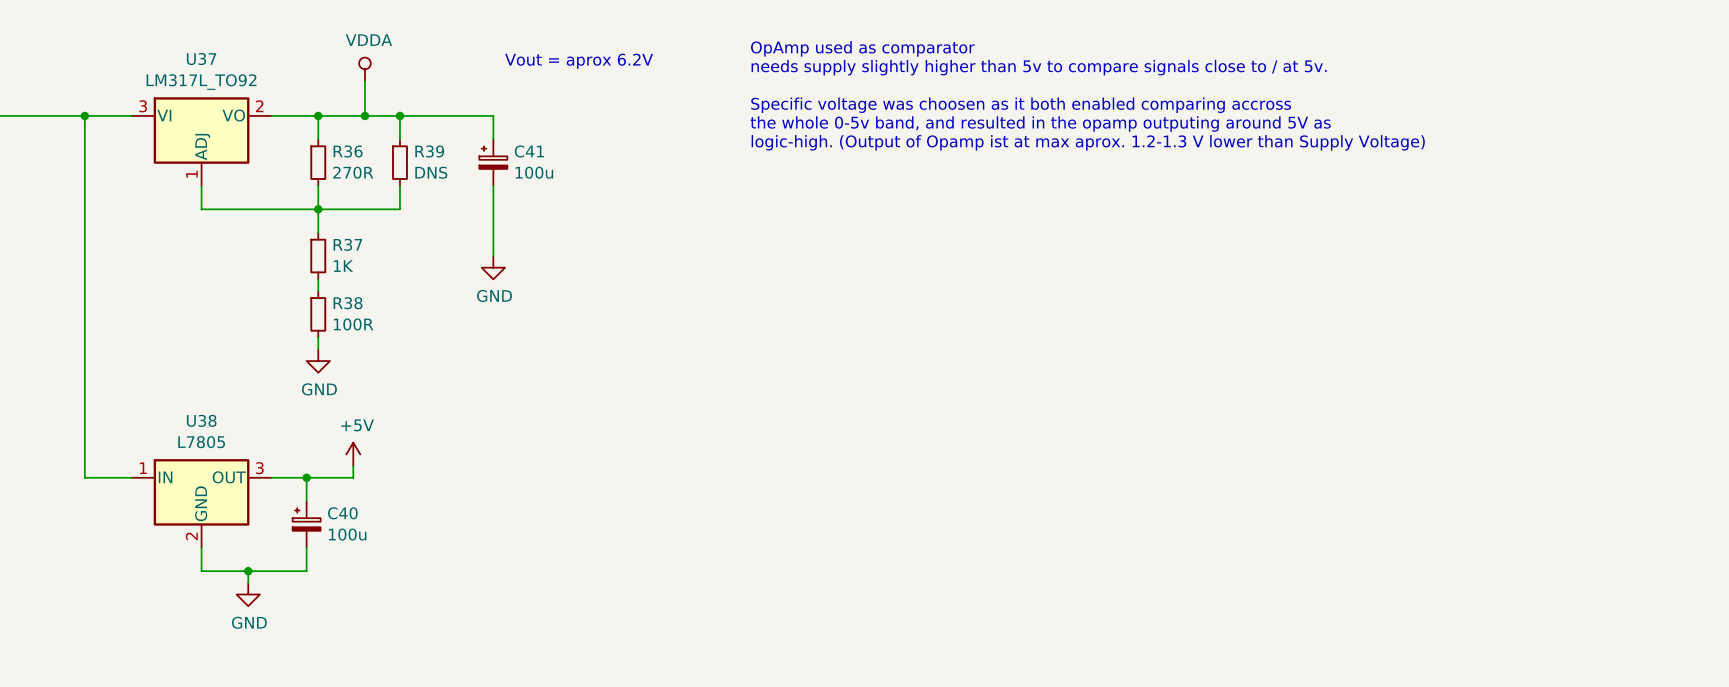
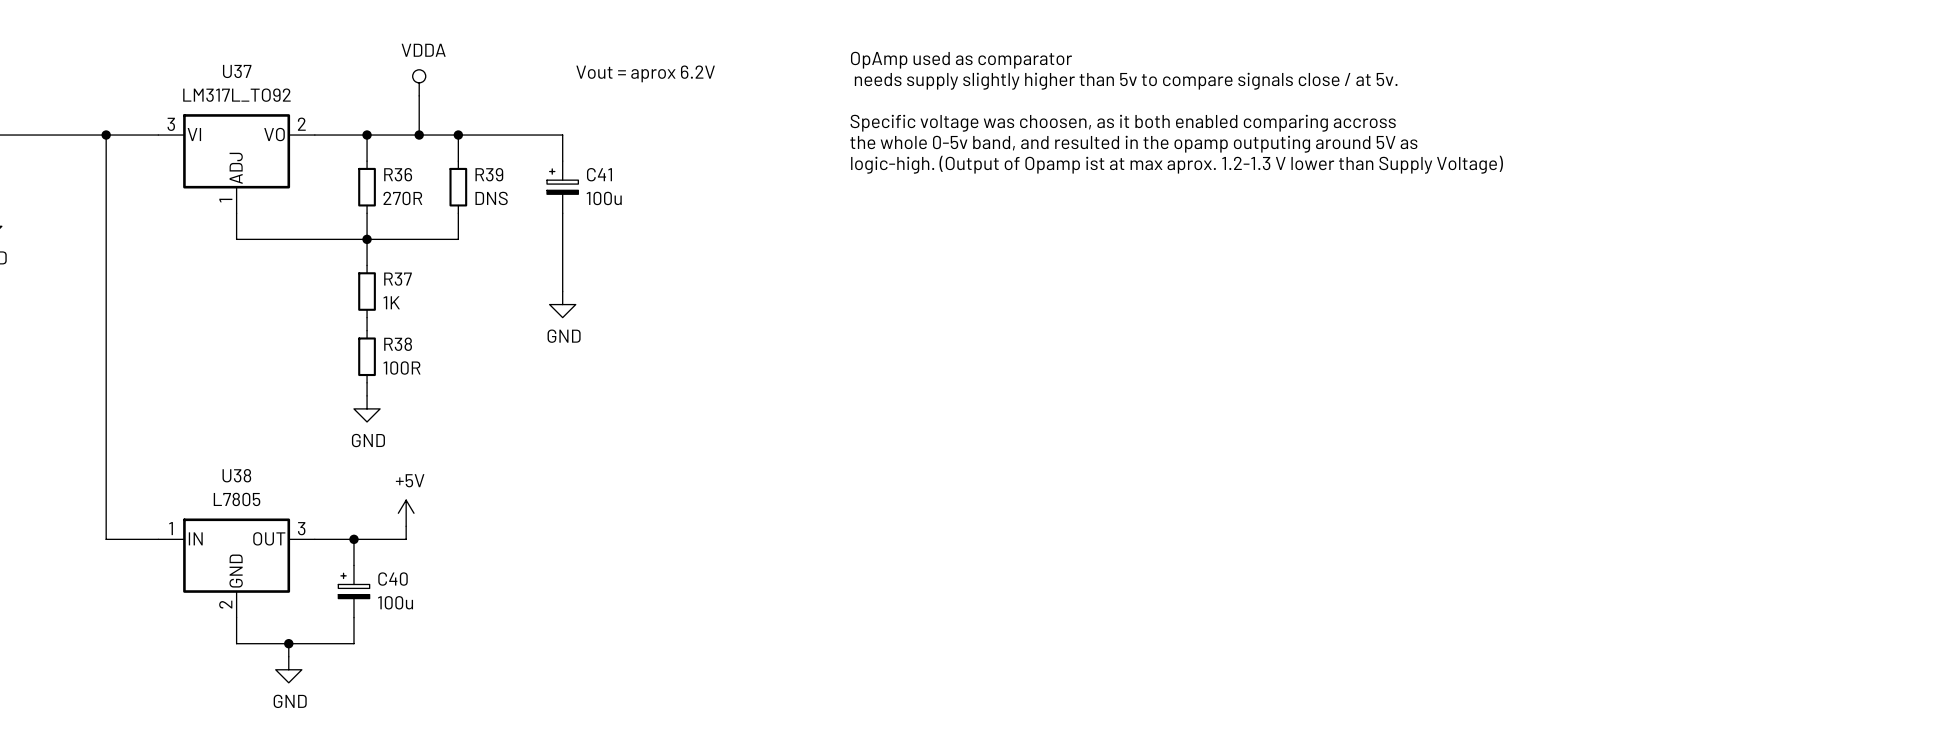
text: needs supply slightly higher than 5v to compare signals close to / at 5v. (1039, 67) -> needs supply slightly higher than 5v to compare signals close / at 5v. (1126, 81)
text: Specific voltage was choosen as it both enabled comparing accross (1021, 105) -> Specific voltage was choosen, as it both enabled comparing accross (1123, 123)

